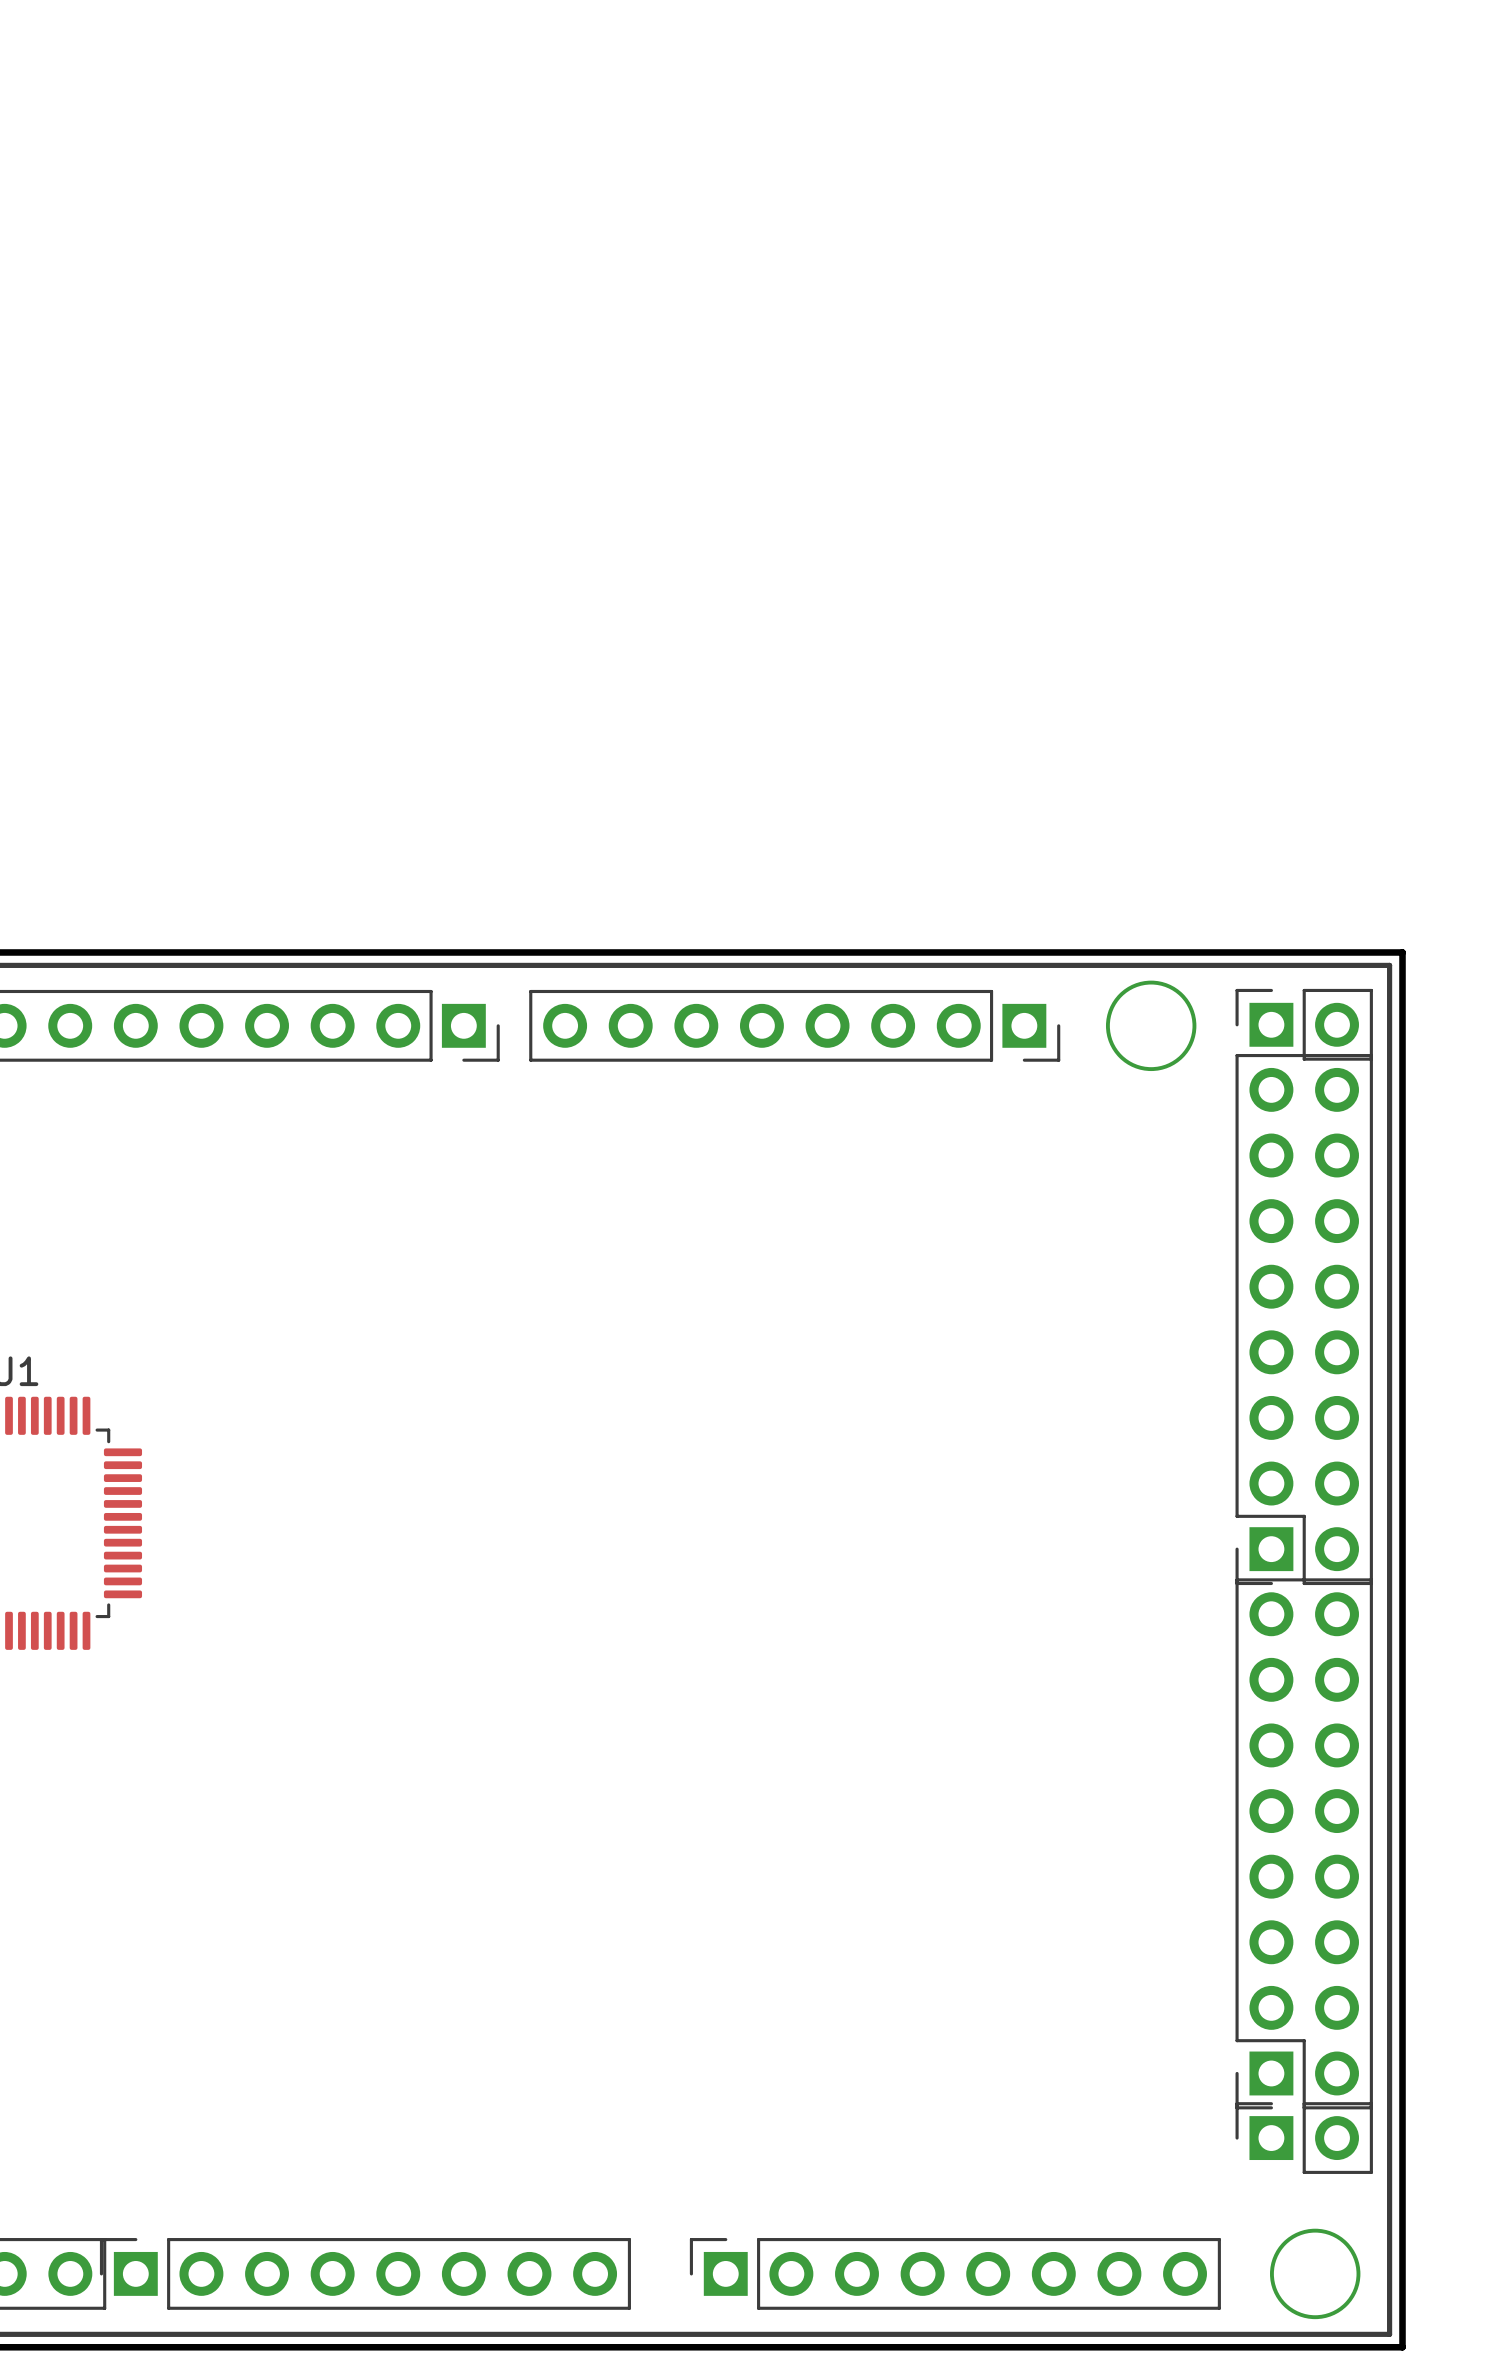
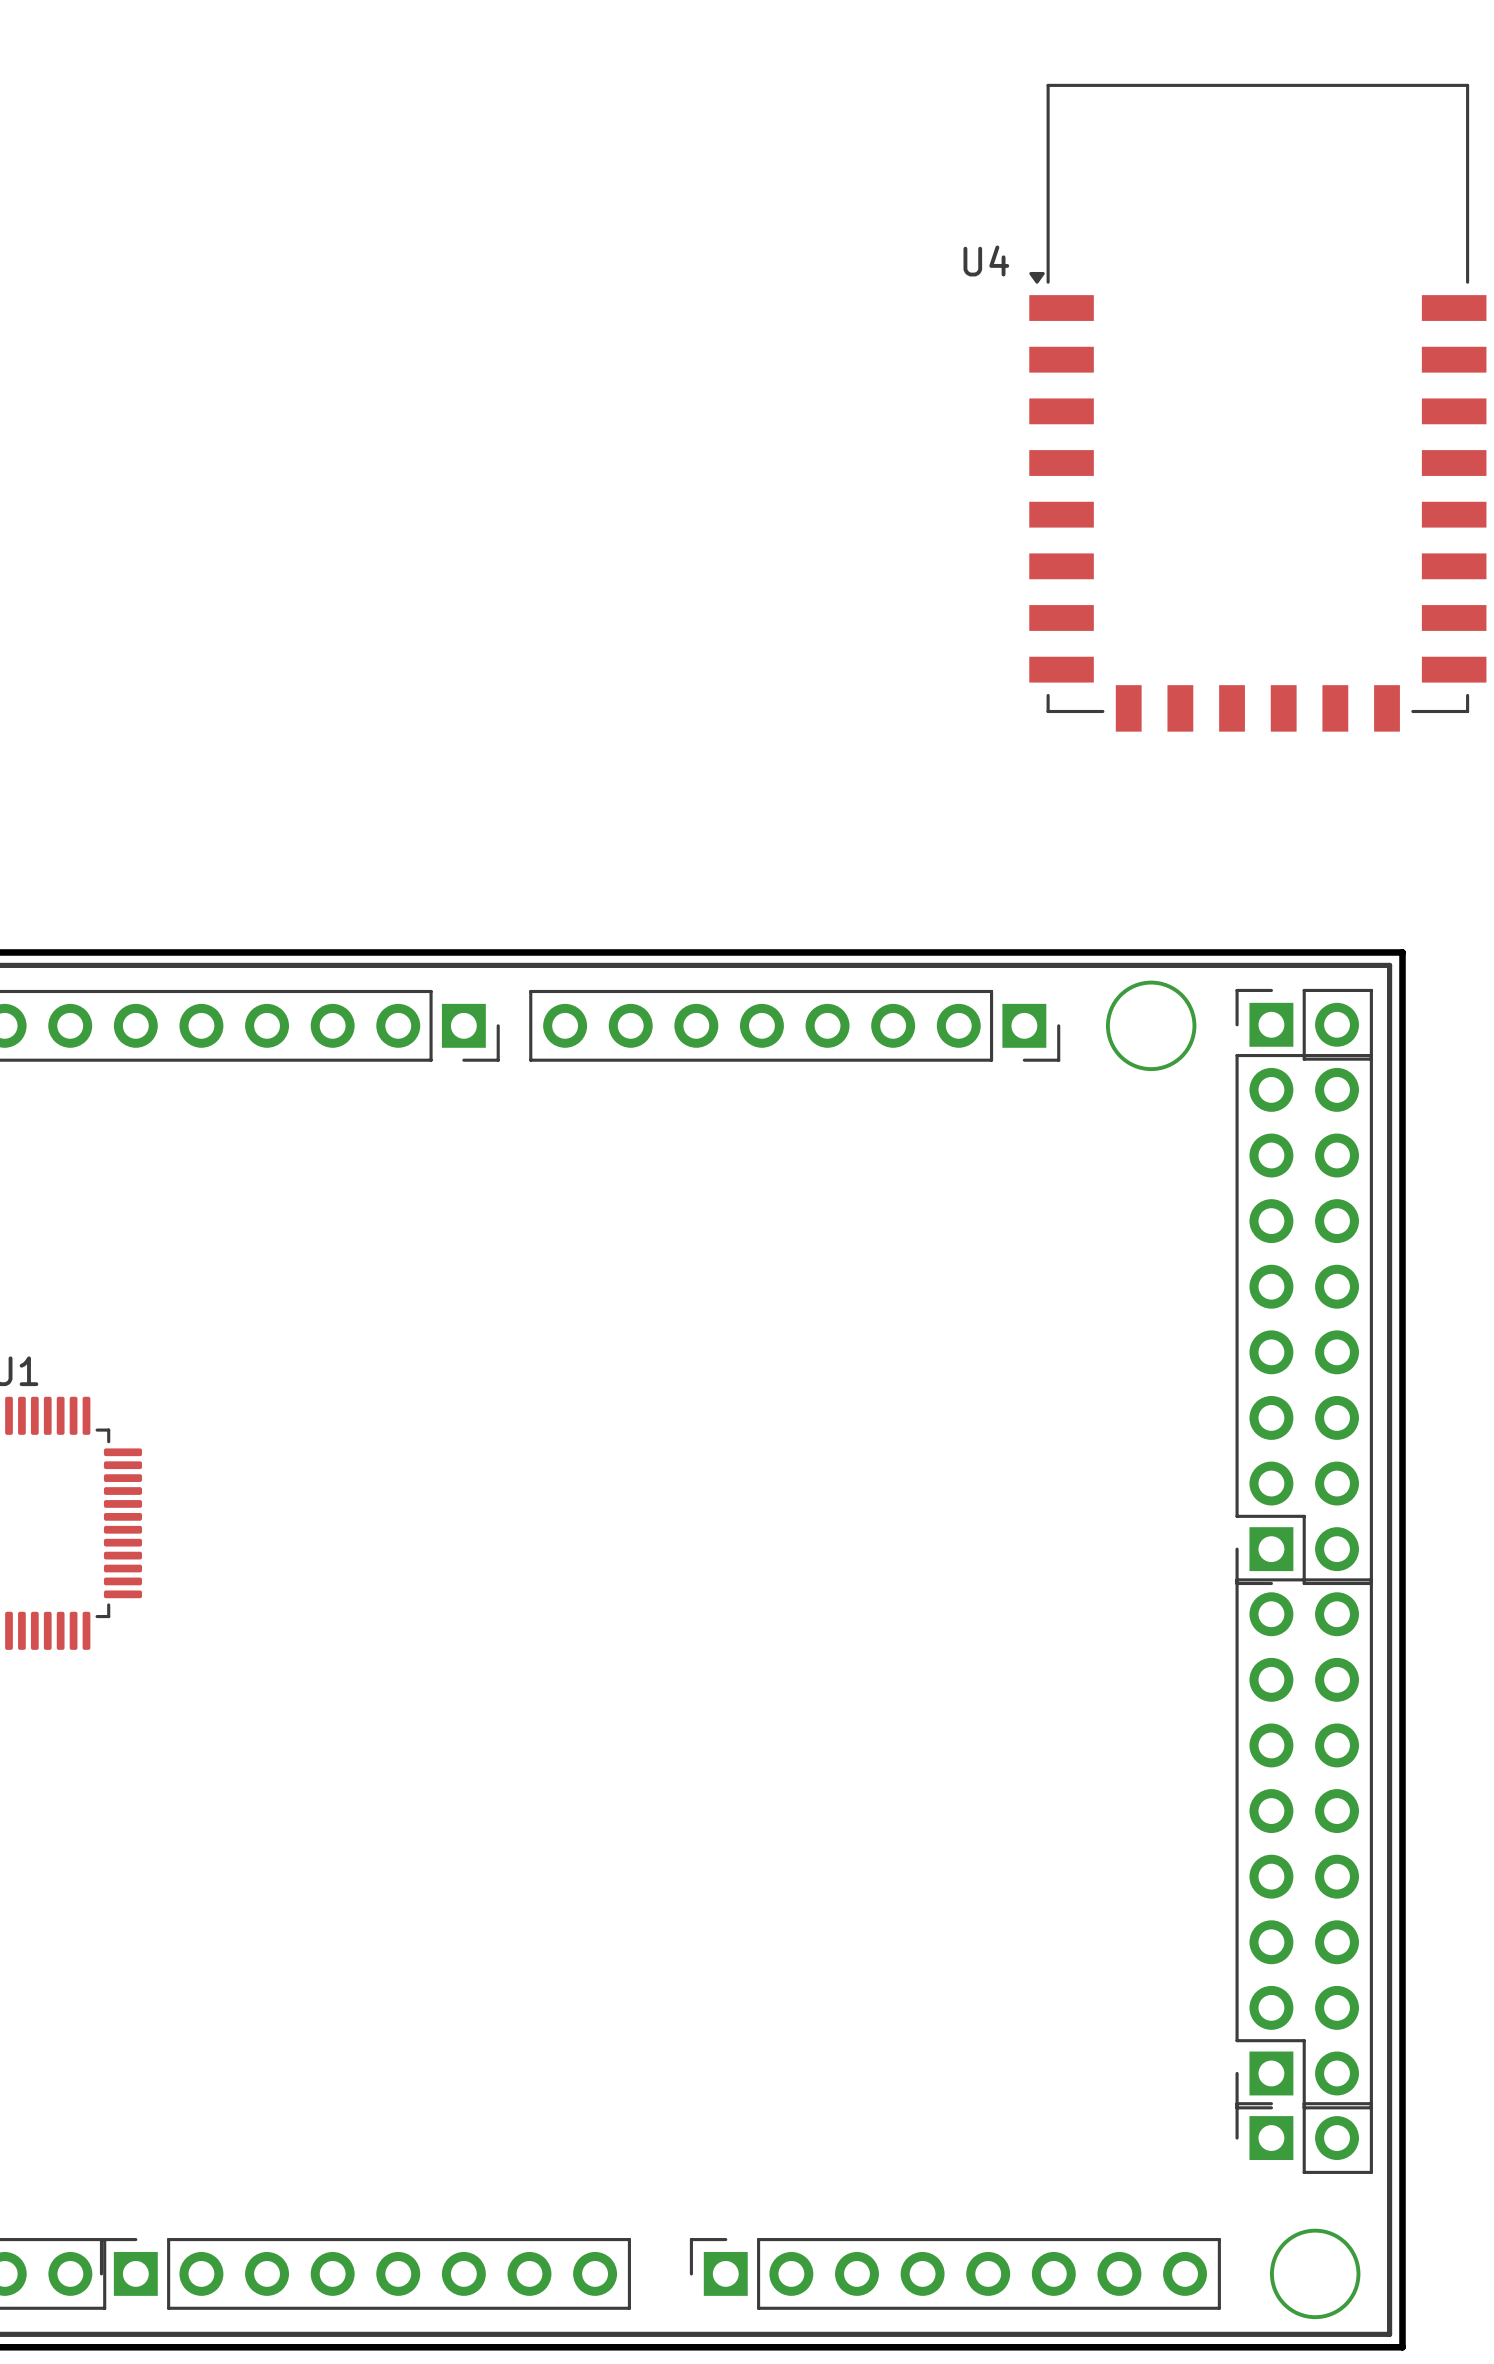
U4: none -> (1257, 407)

